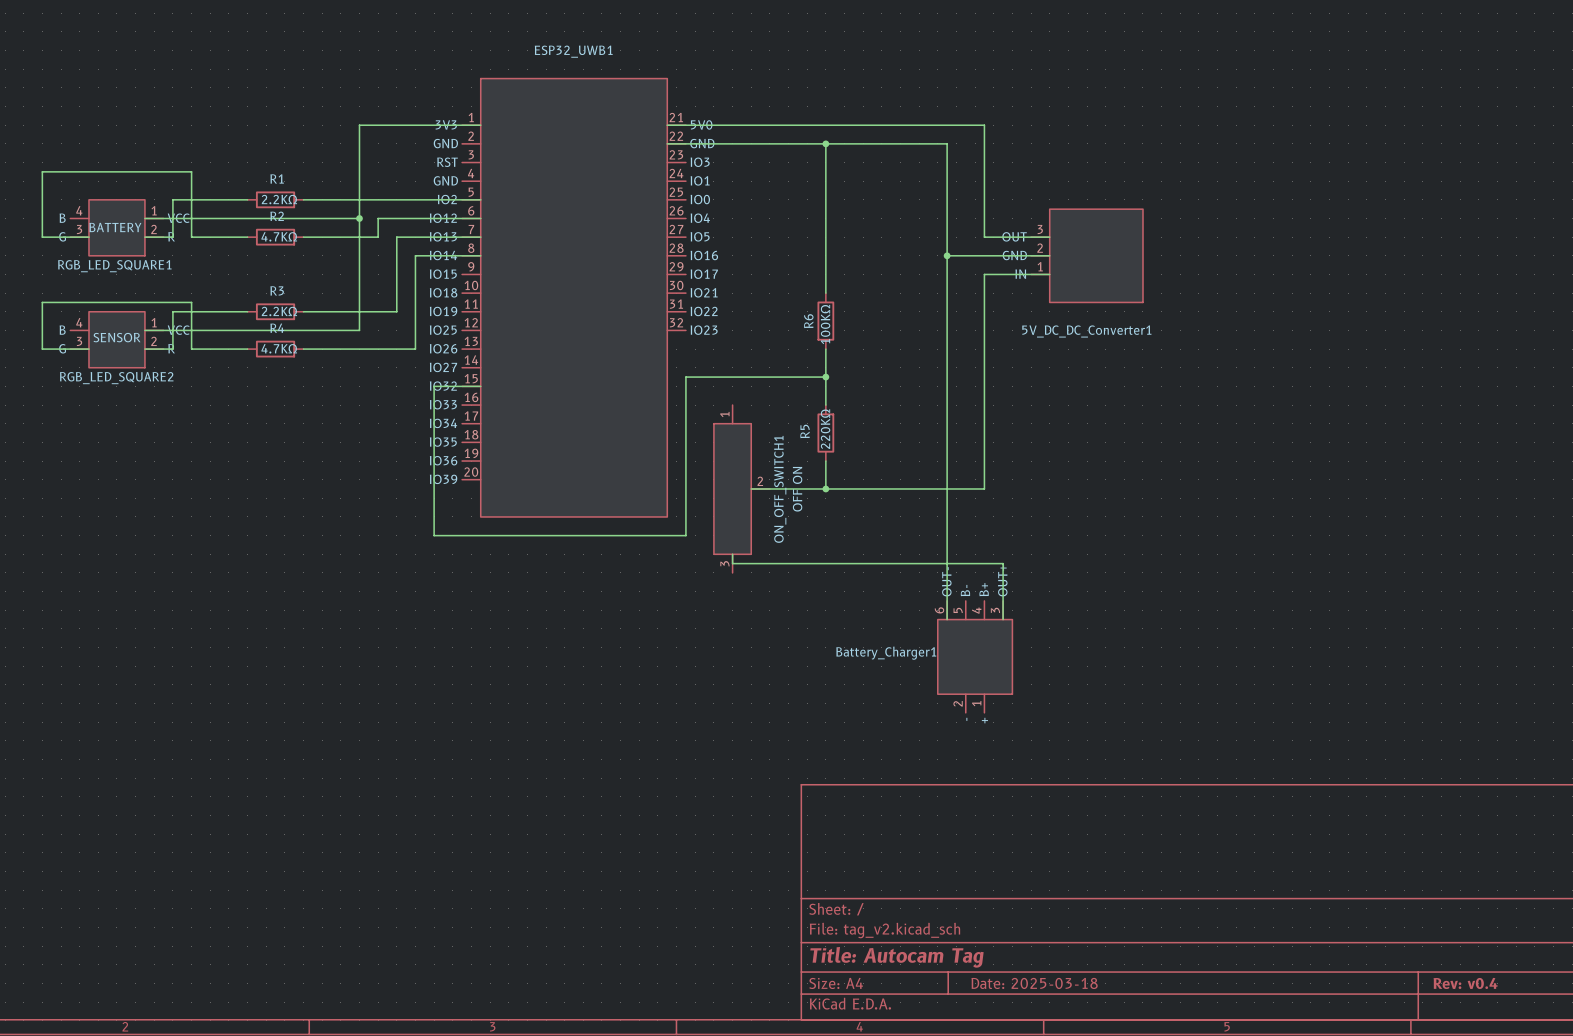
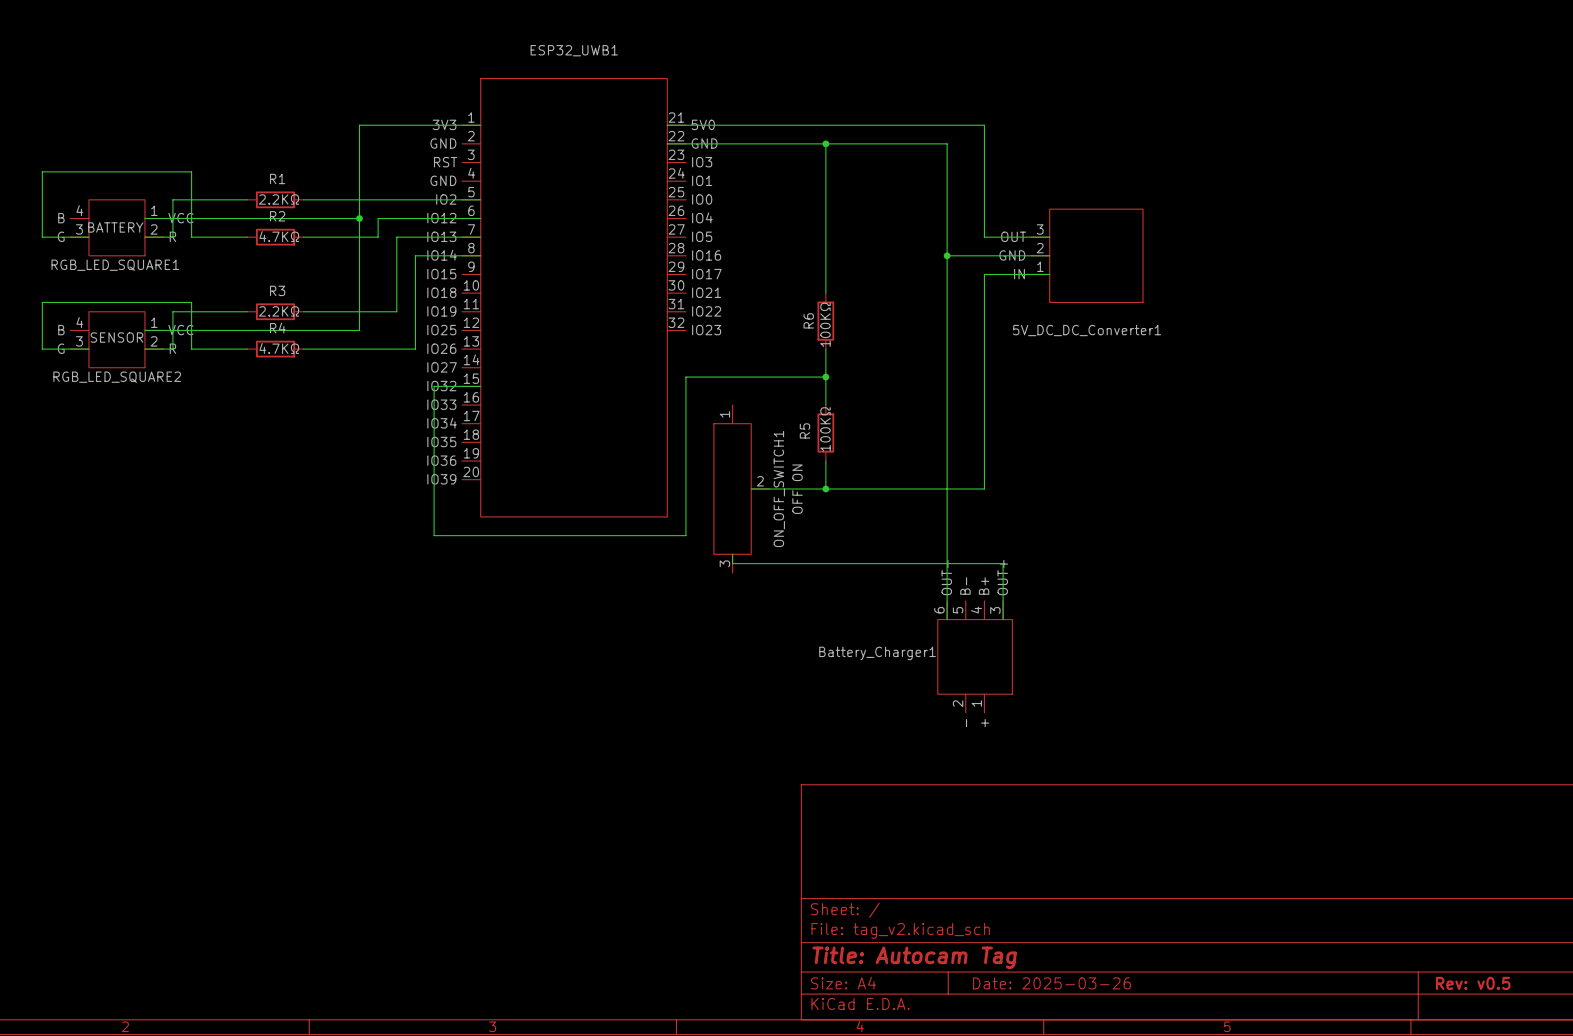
R5 value: 220KΩ (825, 429) -> 100KΩ (825, 429)
title block: Date: 2025-03-18 (1034, 983) -> Date: 2025-03-26 (1052, 983)
title block: Rev: v0.4 (1465, 983) -> Rev: v0.5 (1473, 983)

